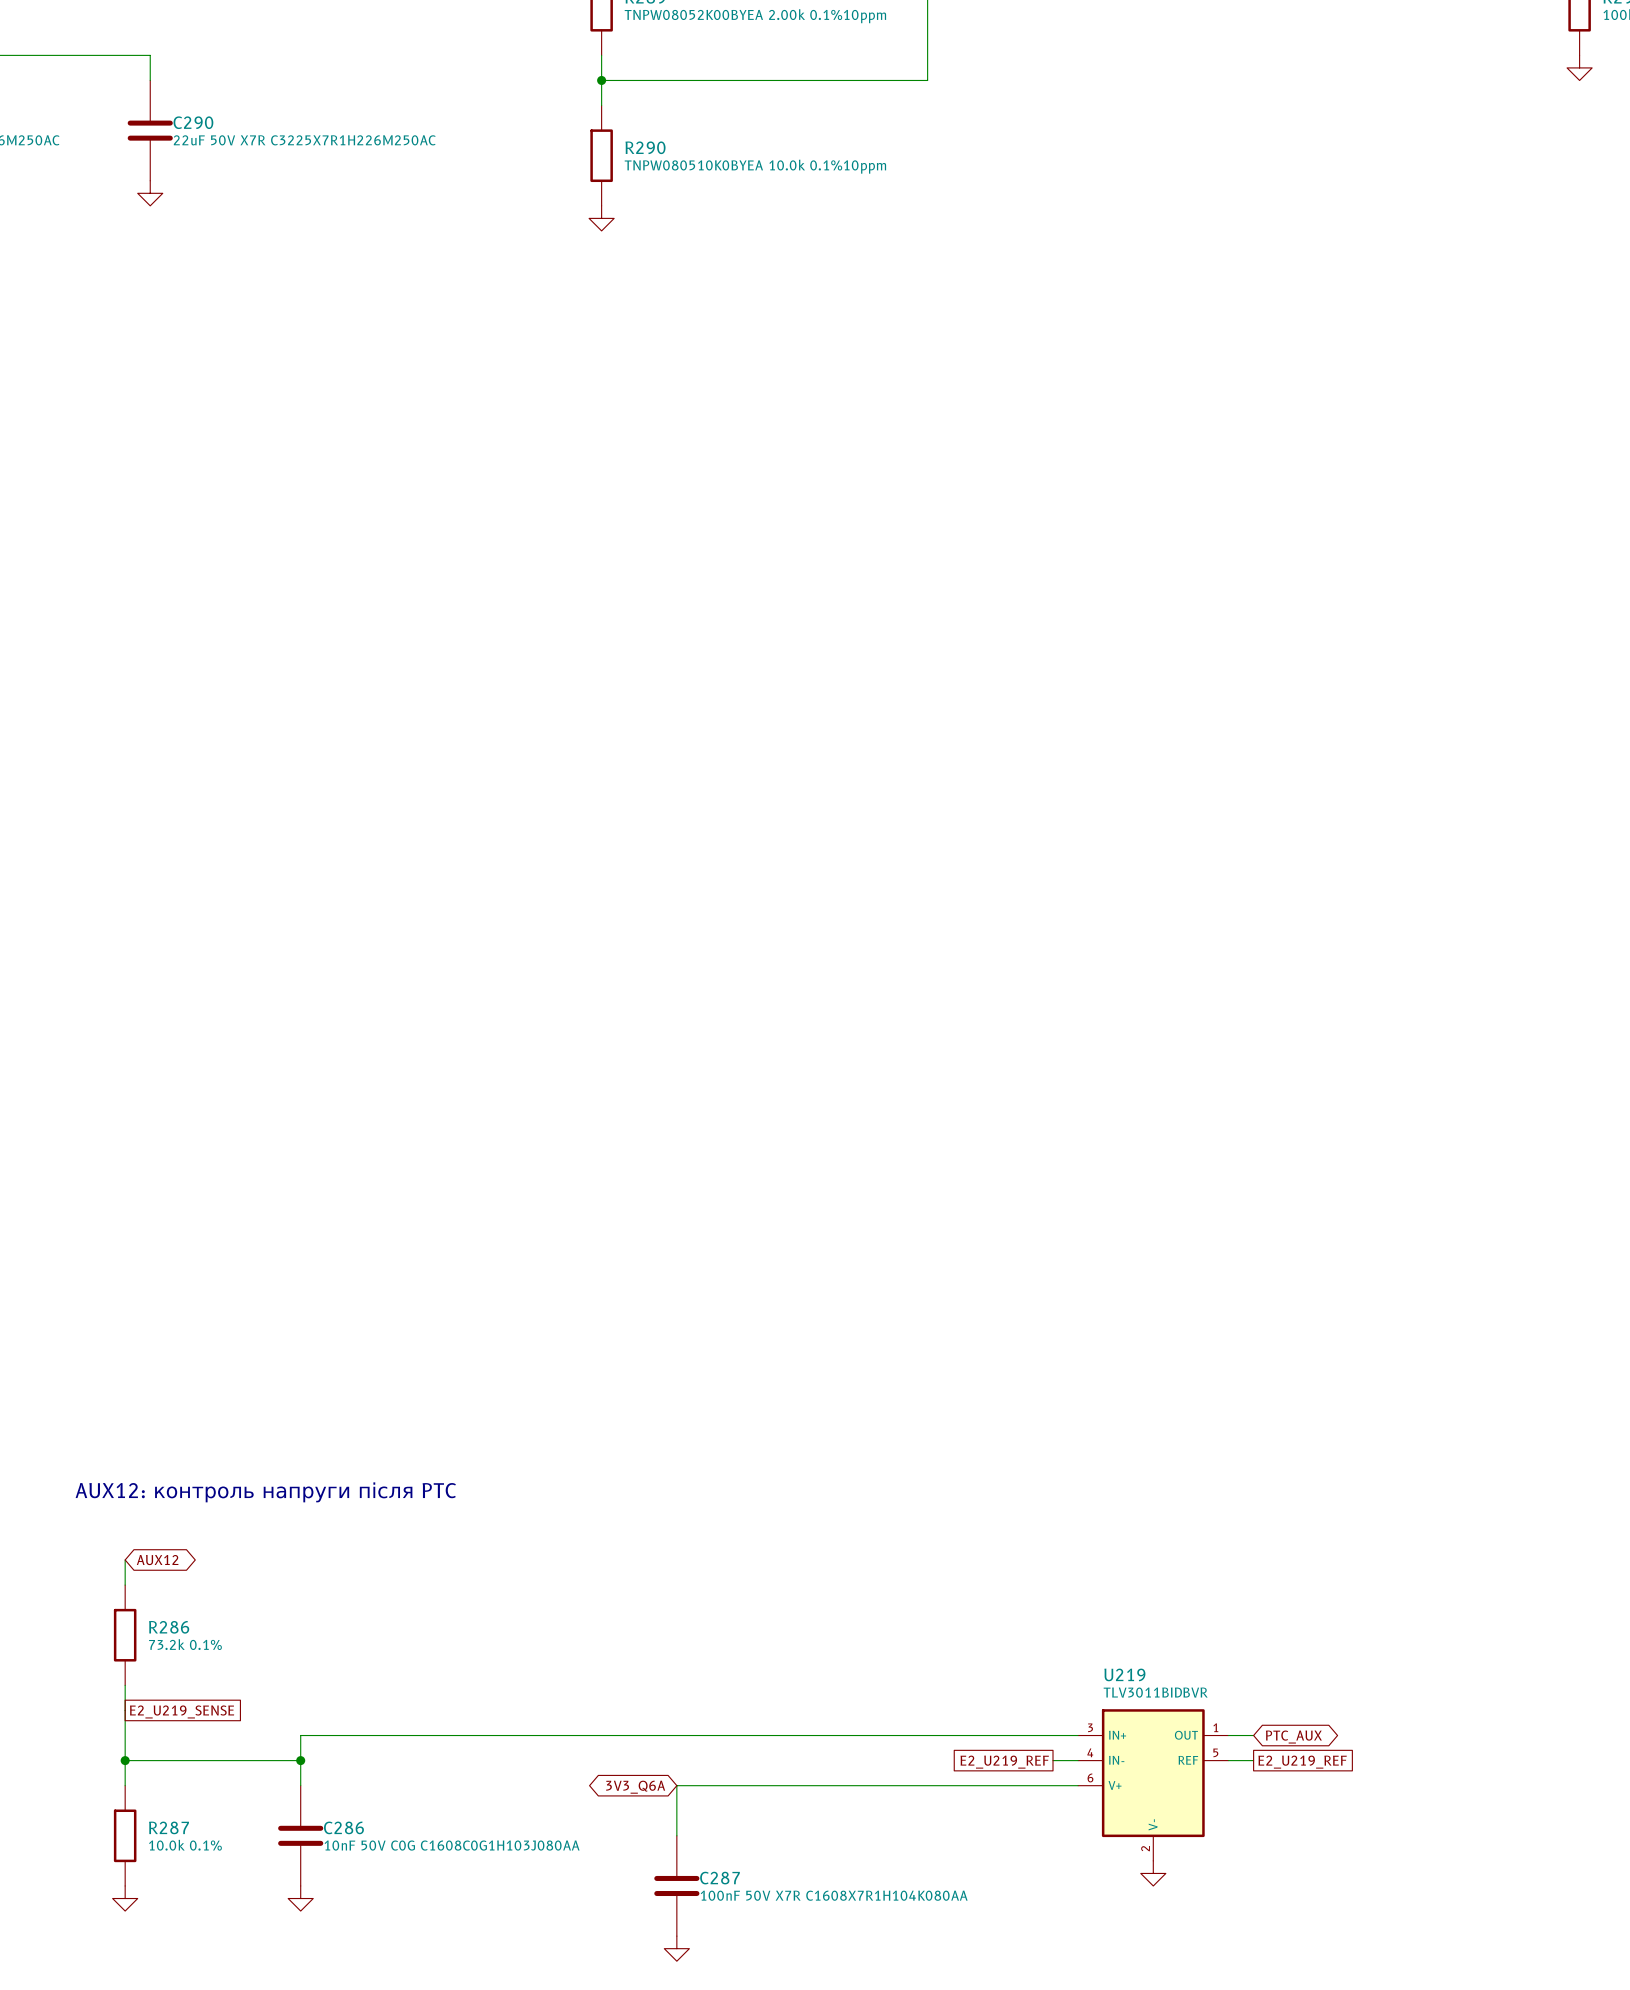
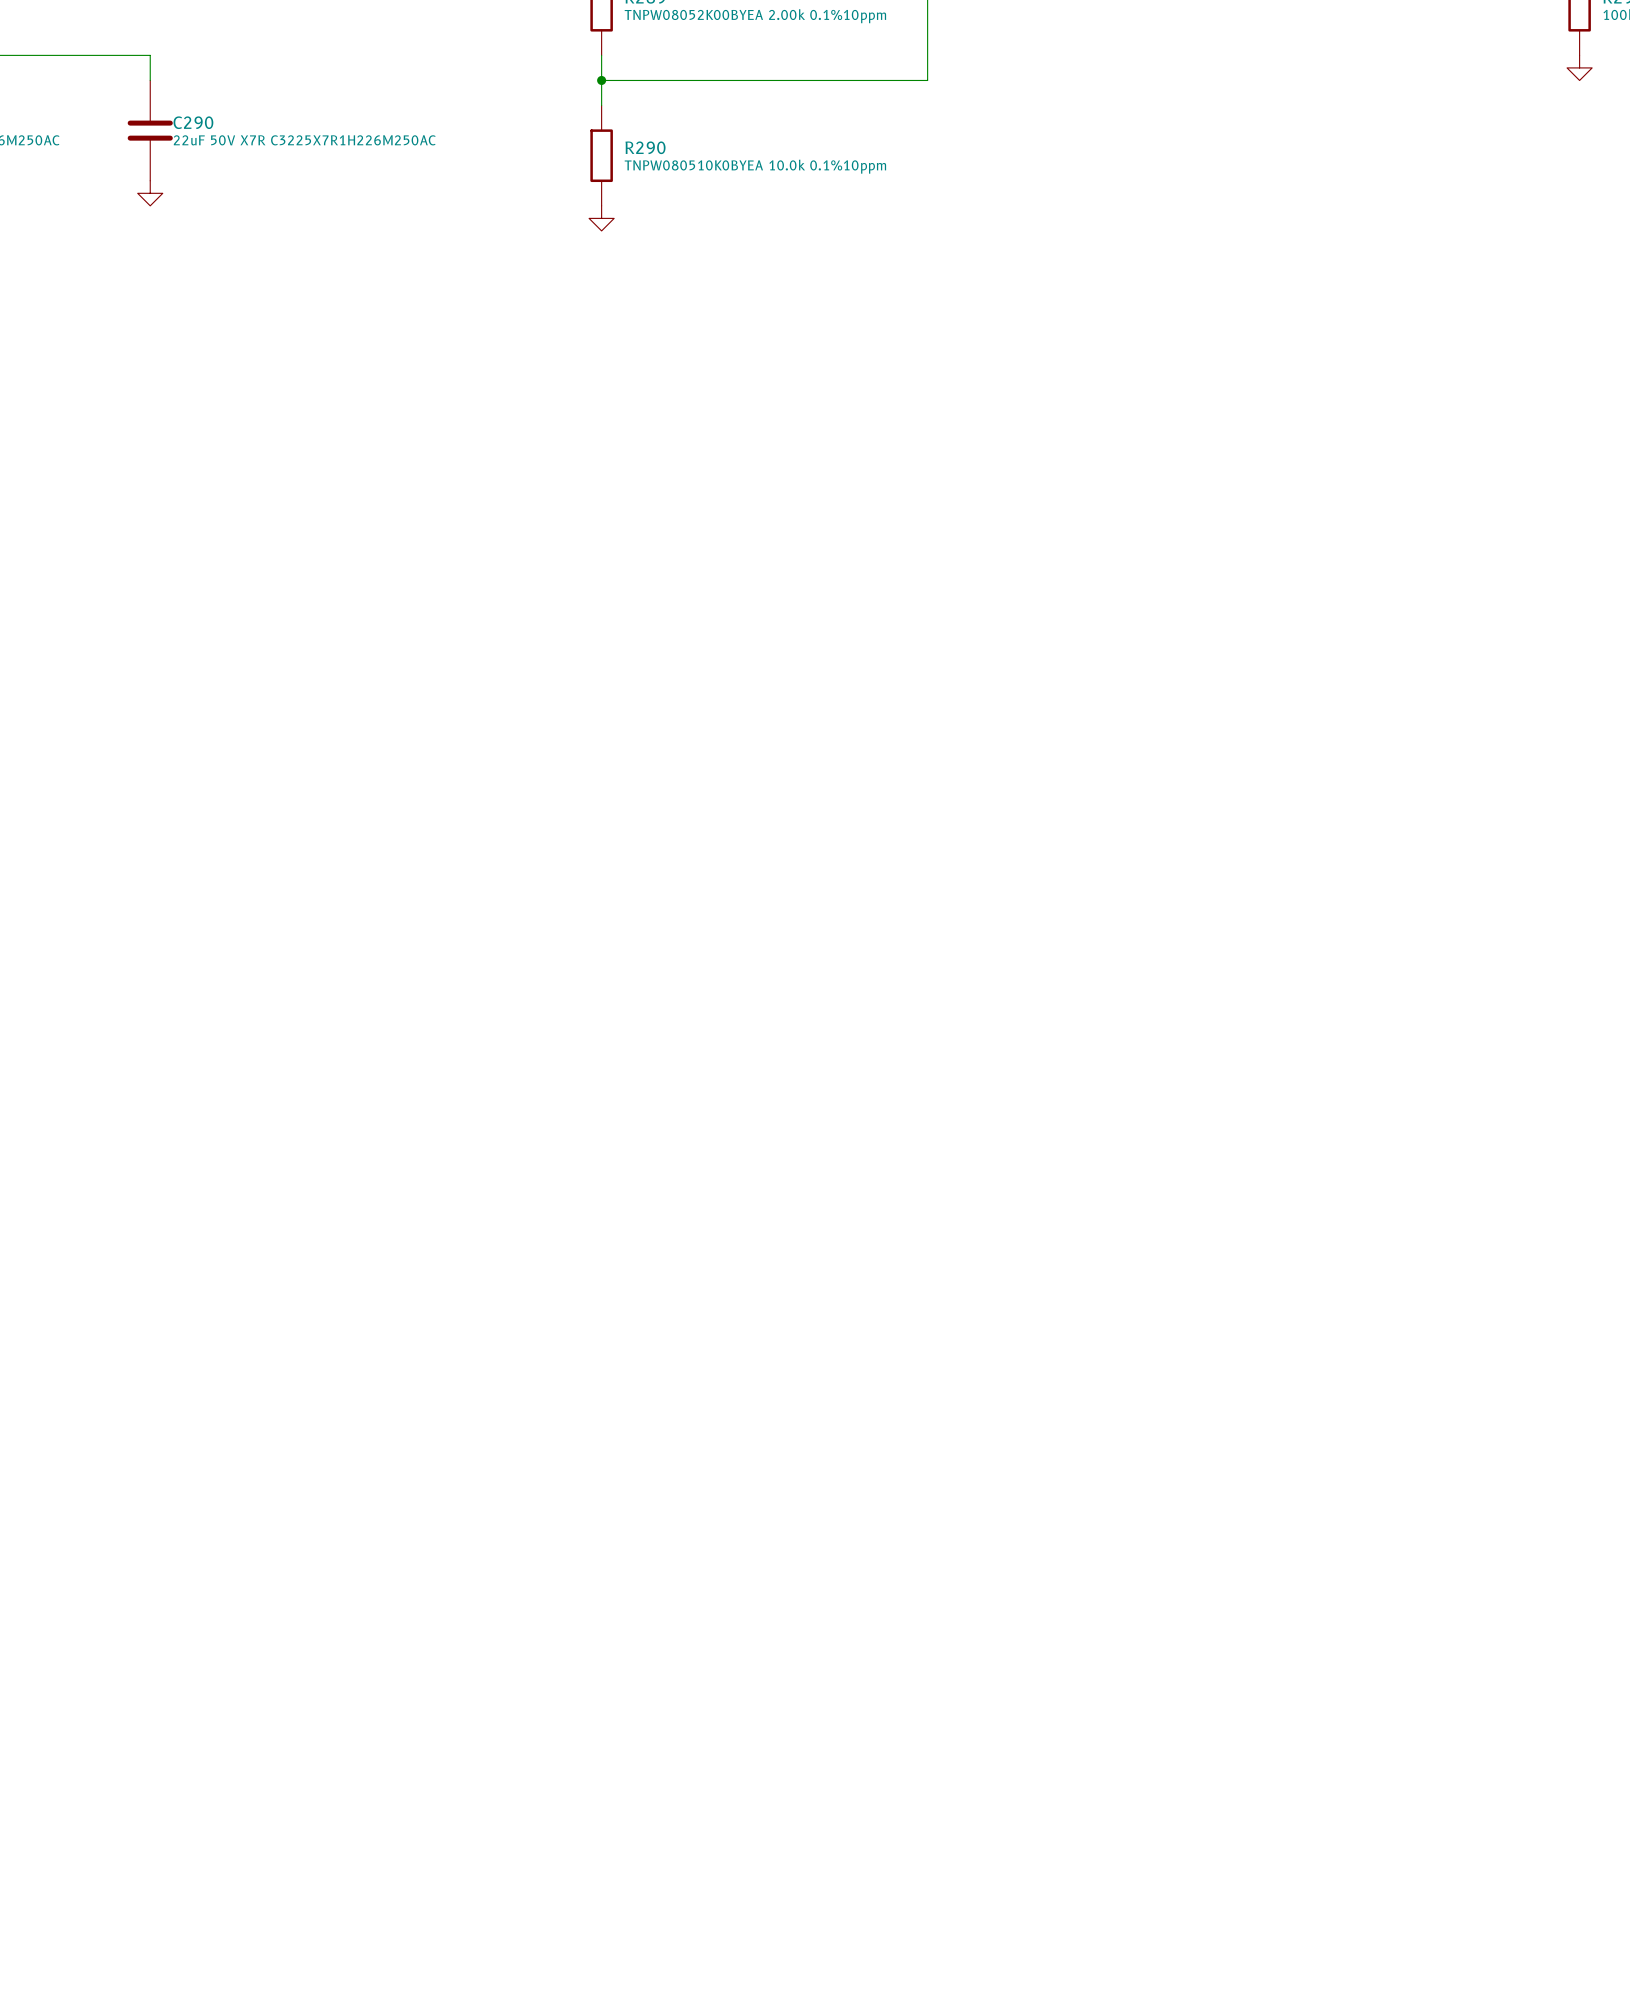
text: AUX12: контроль напруги після PTC (265, 1492) -> none
wire: (125, 1559) (125, 1585) -> none
global label: AUX12 (157, 1560) -> none
R286: 73.2k 0.1% (125, 1635) -> none
wire: (125, 1685) (125, 1785) -> none
global label: E2_U219_SENSE (182, 1711) -> none
wire: (1078, 1735) (300, 1735) (300, 1785) -> none
wire: (1228, 1735) (1253, 1735) -> none
global label: PTC_AUX (1293, 1737) -> none
wire: (125, 1760) (300, 1760) -> none
junction: (125, 1760) -> none
junction: (300, 1760) -> none
wire: (1053, 1760) (1078, 1760) -> none
wire: (1228, 1760) (1253, 1760) -> none
global label: E2_U219_REF (1004, 1762) -> none
global label: E2_U219_REF (1302, 1762) -> none
wire: (1078, 1785) (676, 1785) (676, 1835) -> none
U219: TLV3011BIDBVR (1153, 1785) -> none
global label: 3V3_Q6A (635, 1787) -> none
R287: 10.0k 0.1% (125, 1835) -> none
C286: 10nF 50V C0G C1608C0G1H103J080AA (300, 1835) -> none
power symbol: (1153, 1873) -> none
C287: 100nF 50V X7R C1608X7R1H104K080AA (676, 1885) -> none
power symbol: (125, 1898) -> none
power symbol: (300, 1898) -> none
power symbol: (676, 1948) -> none

